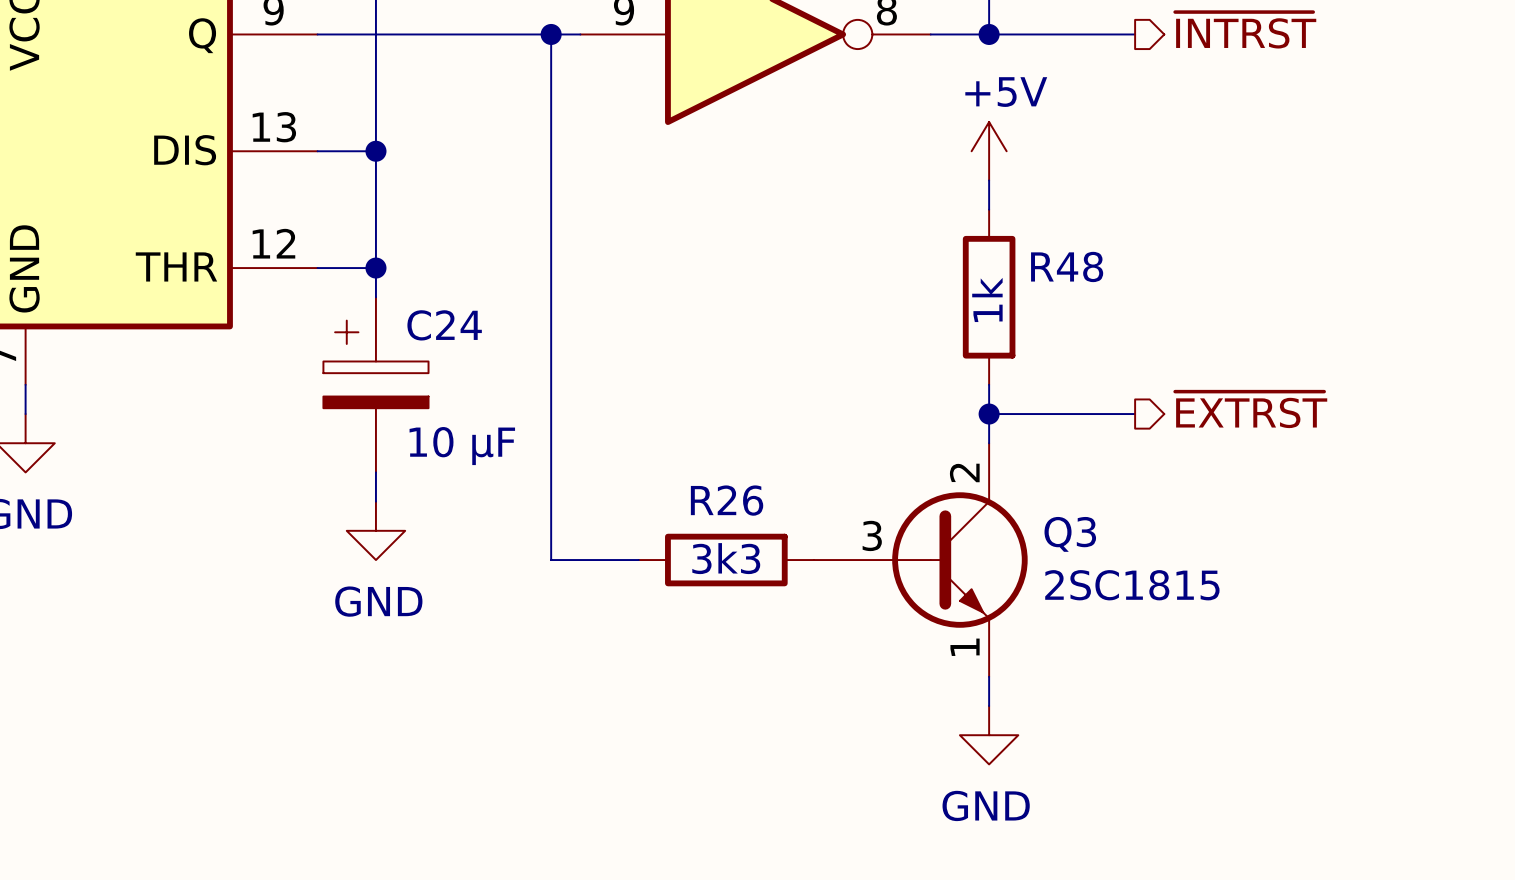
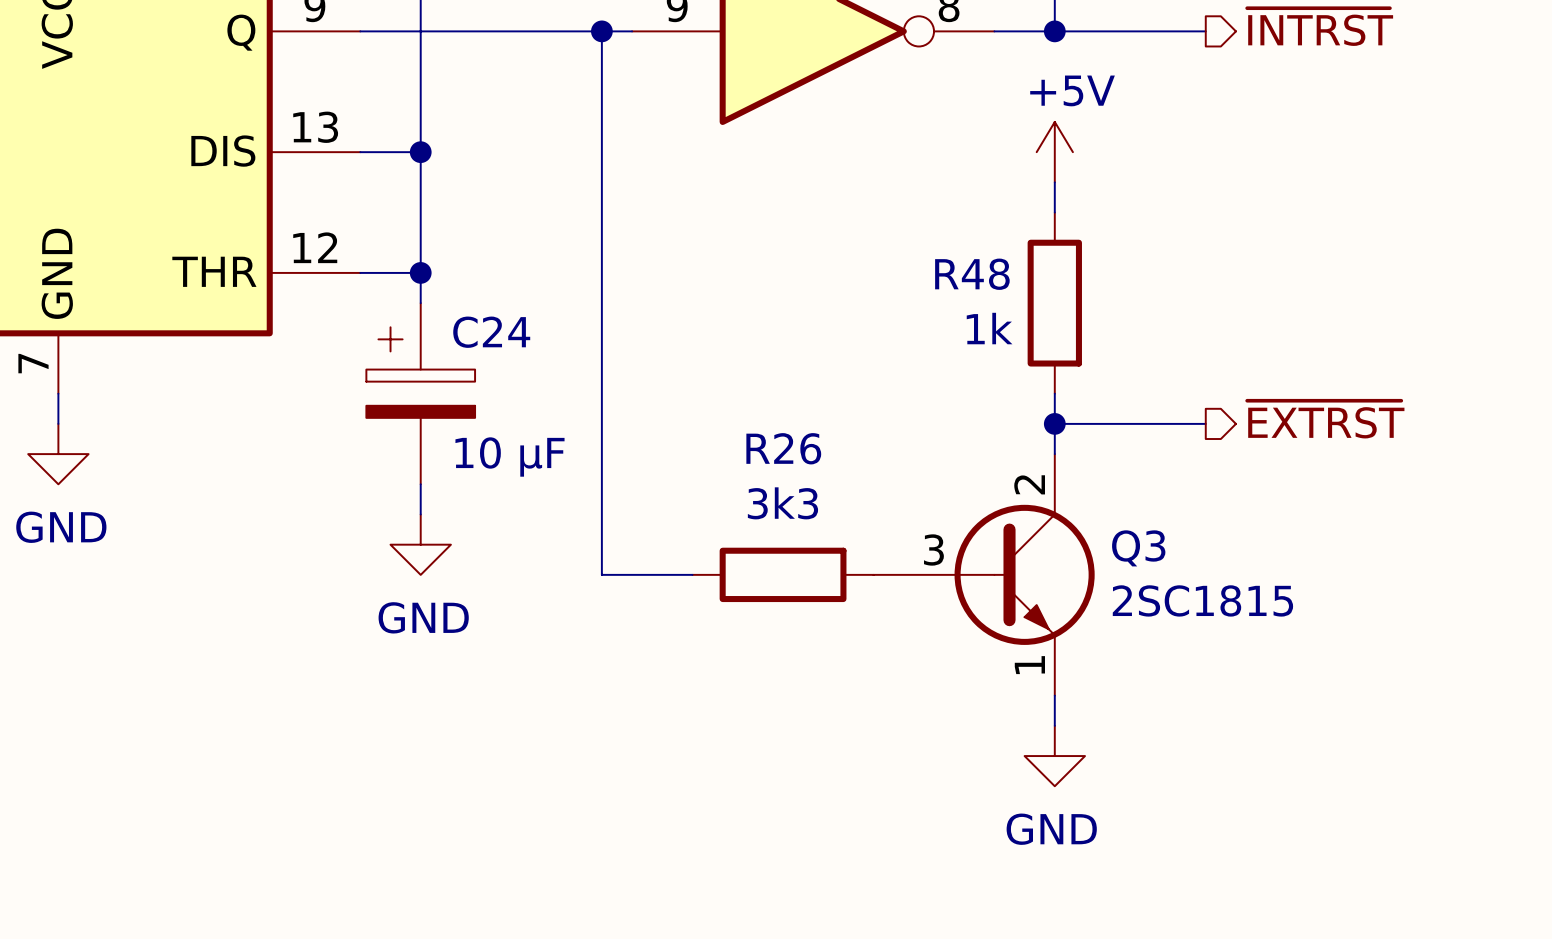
R48 name position: R48 (1067, 266) -> R48 (972, 274)
R48 value rotation: 0° (987, 299) -> 90° clockwise (989, 328)
R48 value position: 1k (987, 299) -> 1k (989, 328)
R26 name position: R26 (727, 500) -> R26 (783, 448)
R26 value position: 3k3 (726, 558) -> 3k3 (782, 503)

